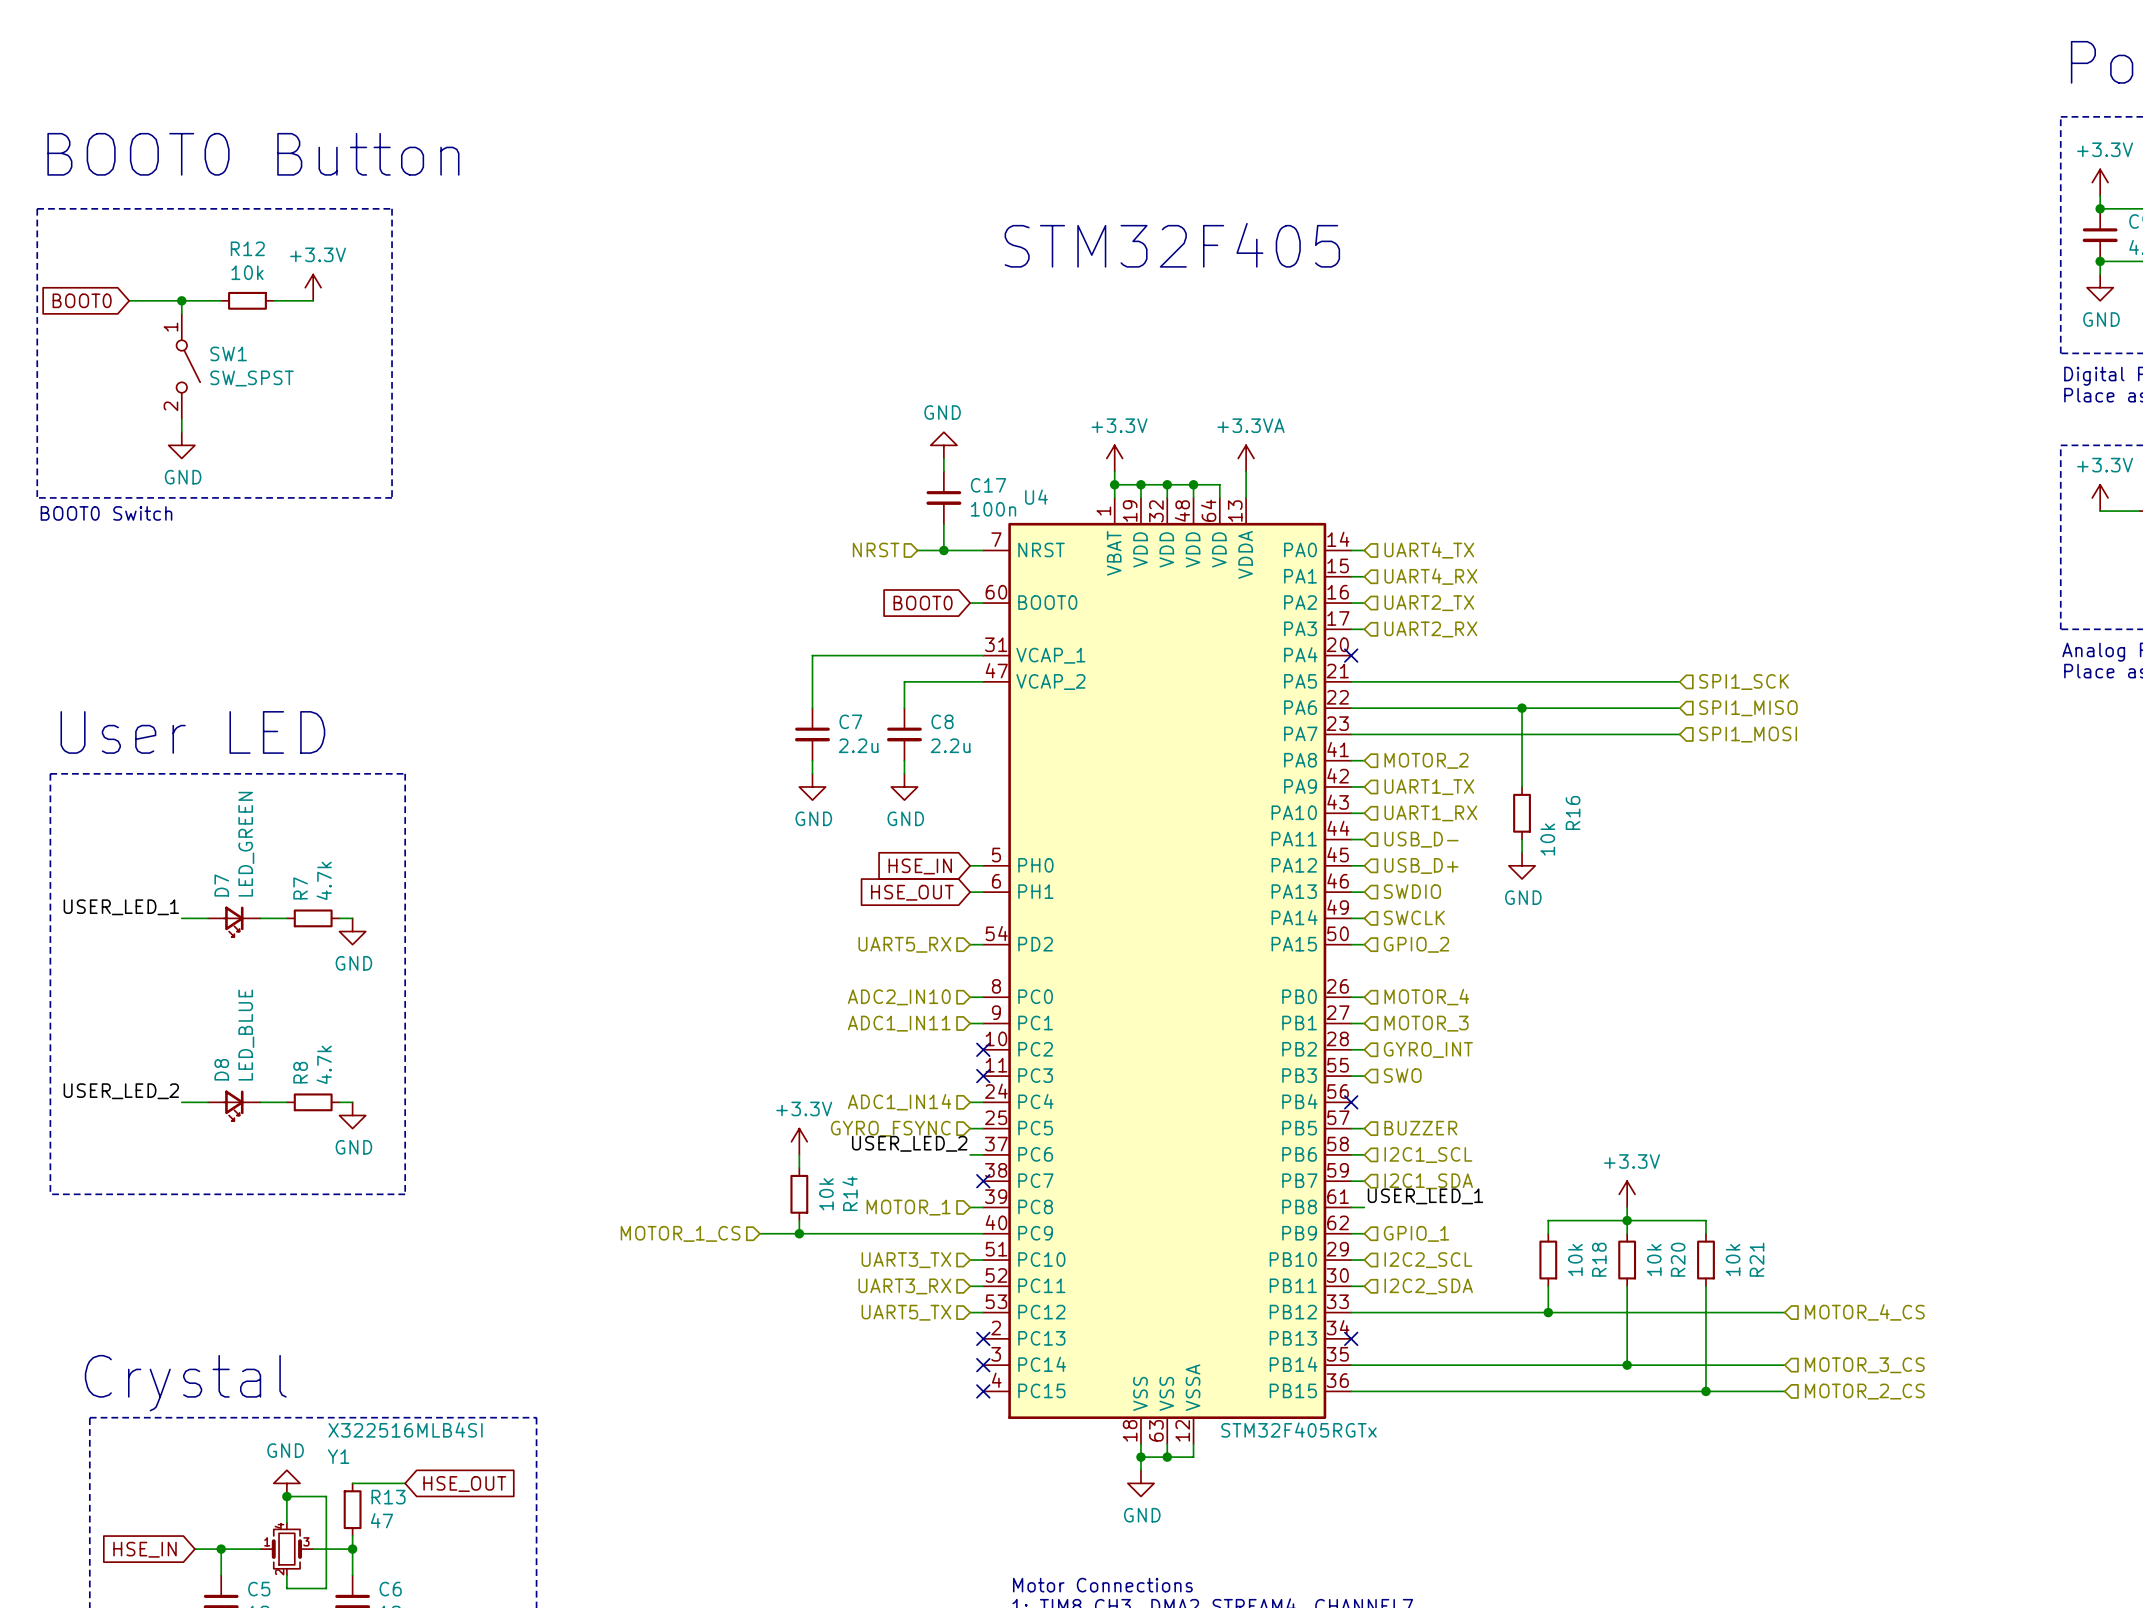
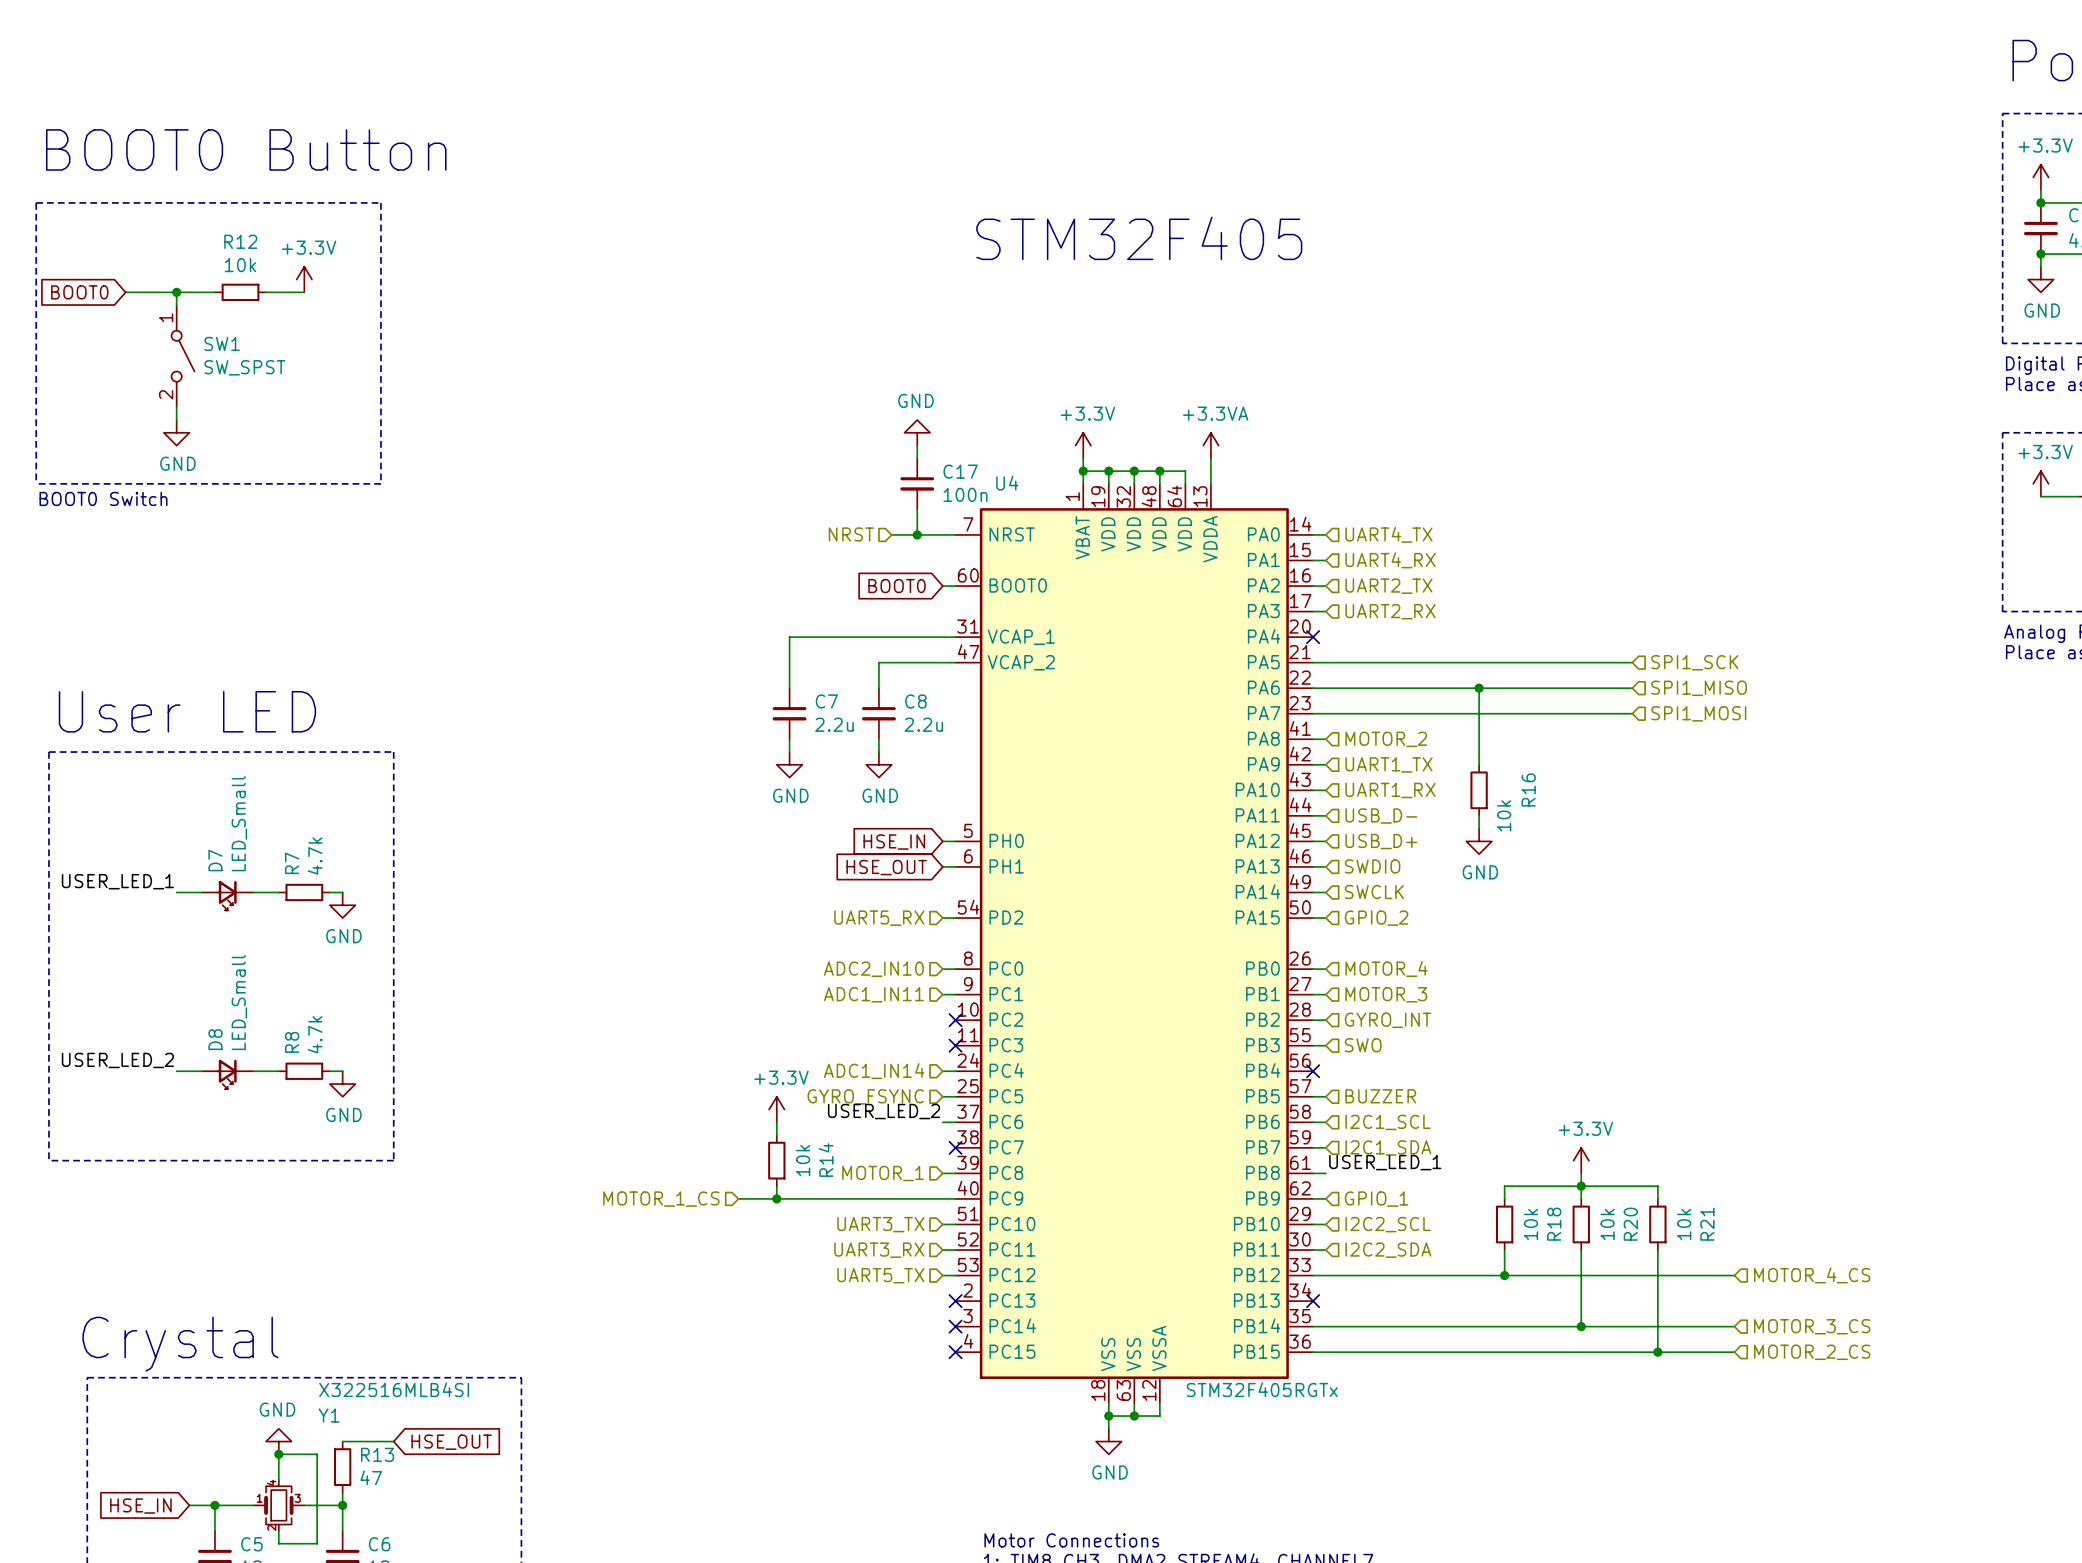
D7 value: LED_GREEN (246, 844) -> LED_Small (239, 823)
D8 value: LED_BLUE (246, 1035) -> LED_Small (239, 1002)

